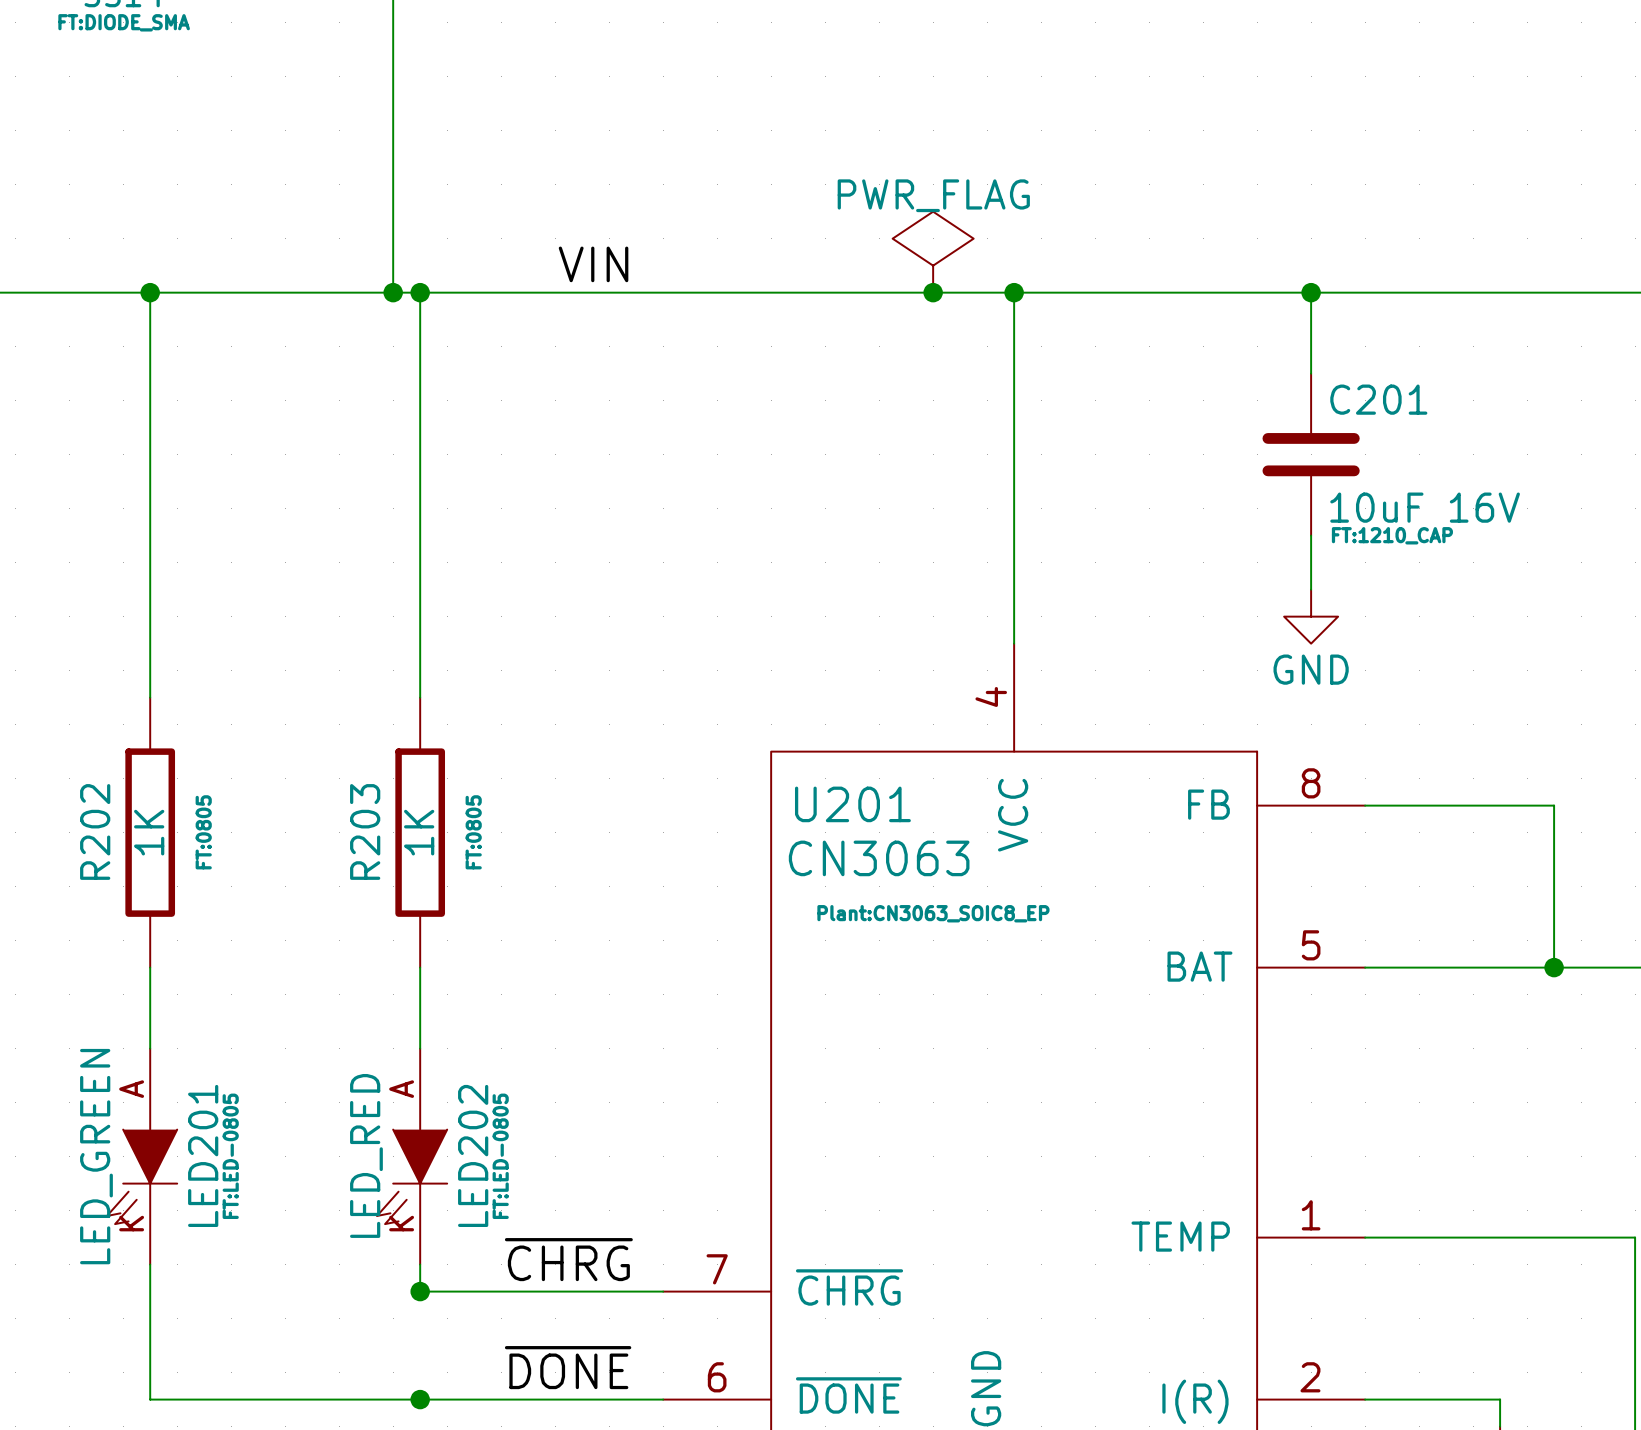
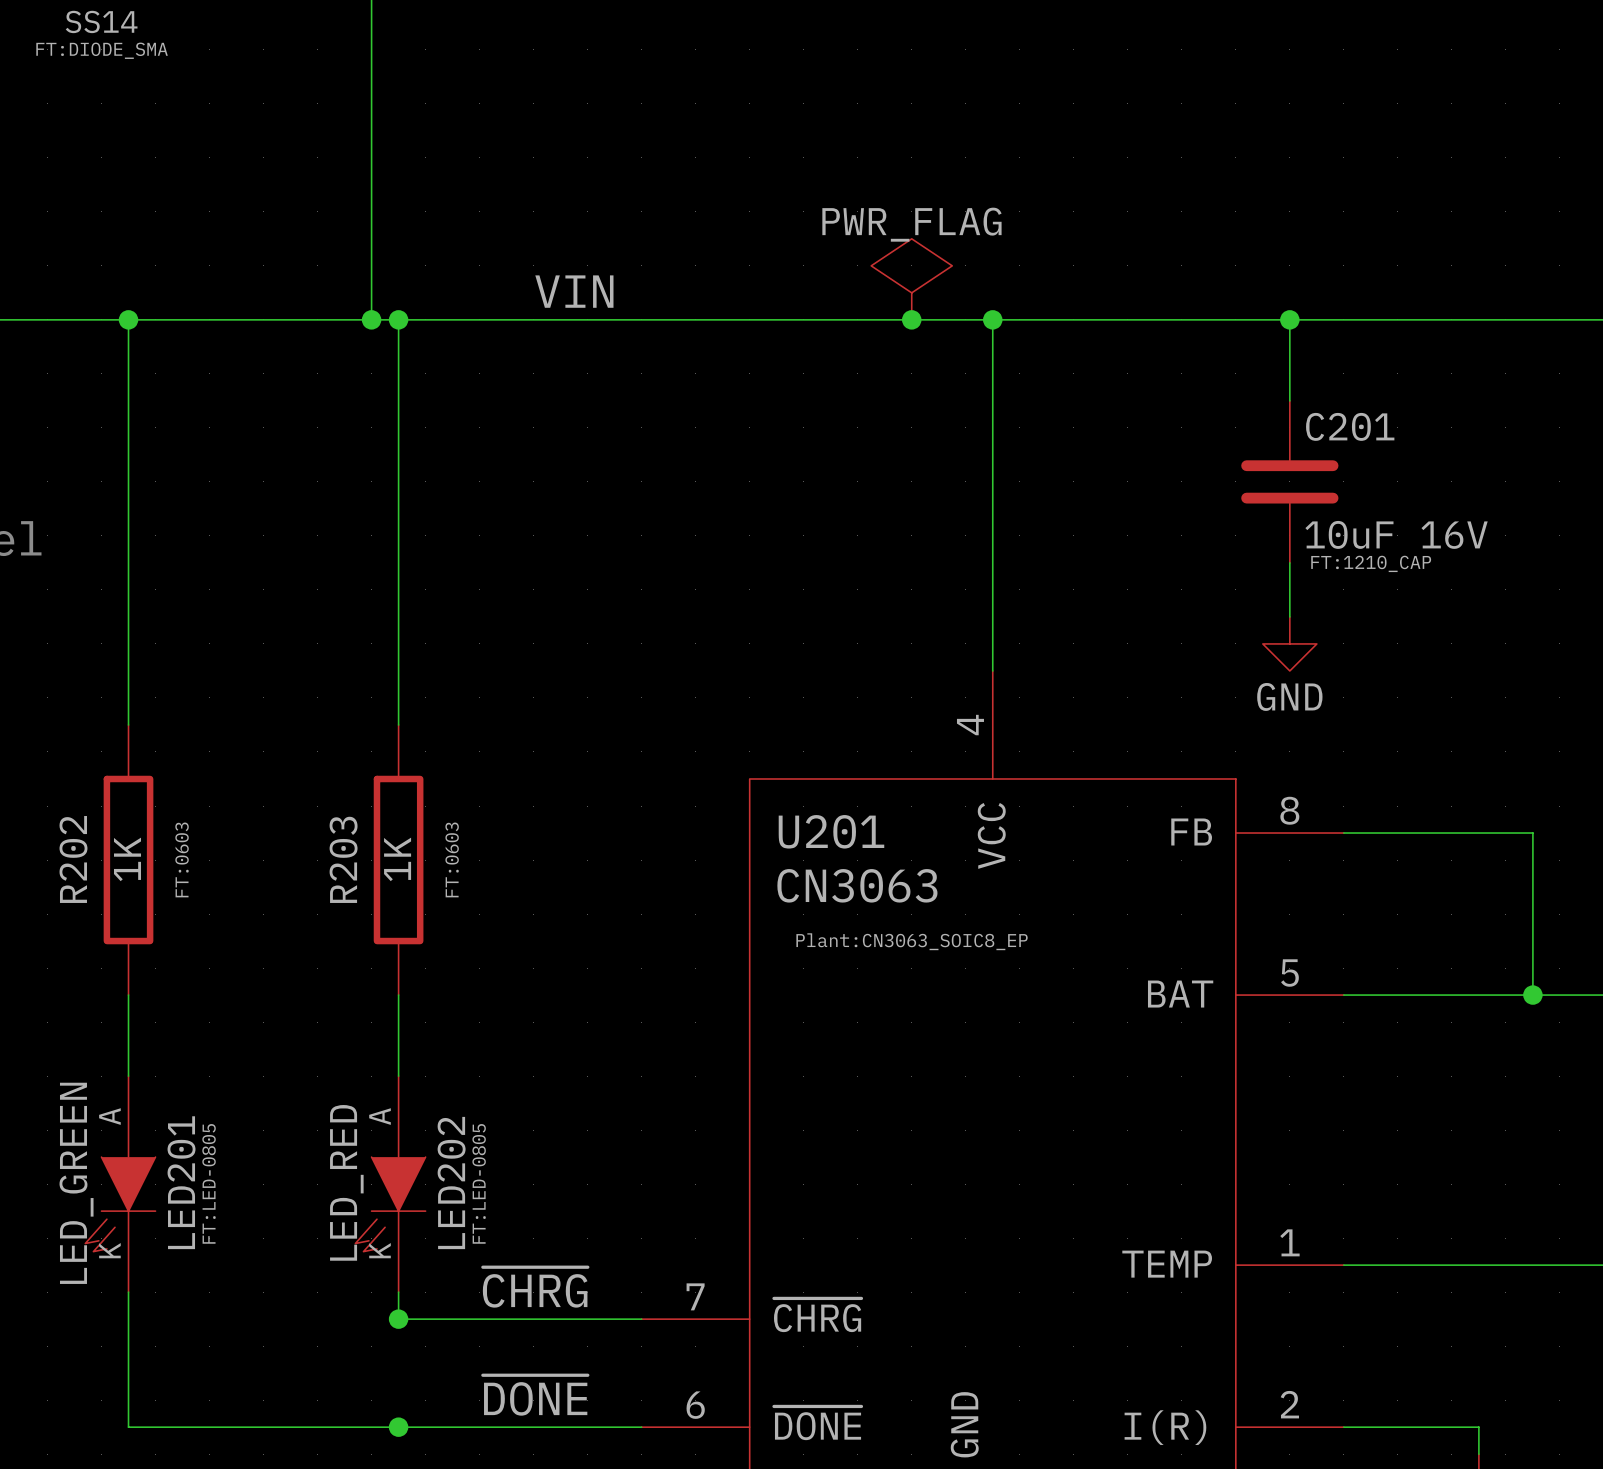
R202 text: FT:0805 (203, 832) -> FT:0603 (182, 859)
R203 text: FT:0805 (473, 832) -> FT:0603 (452, 859)

